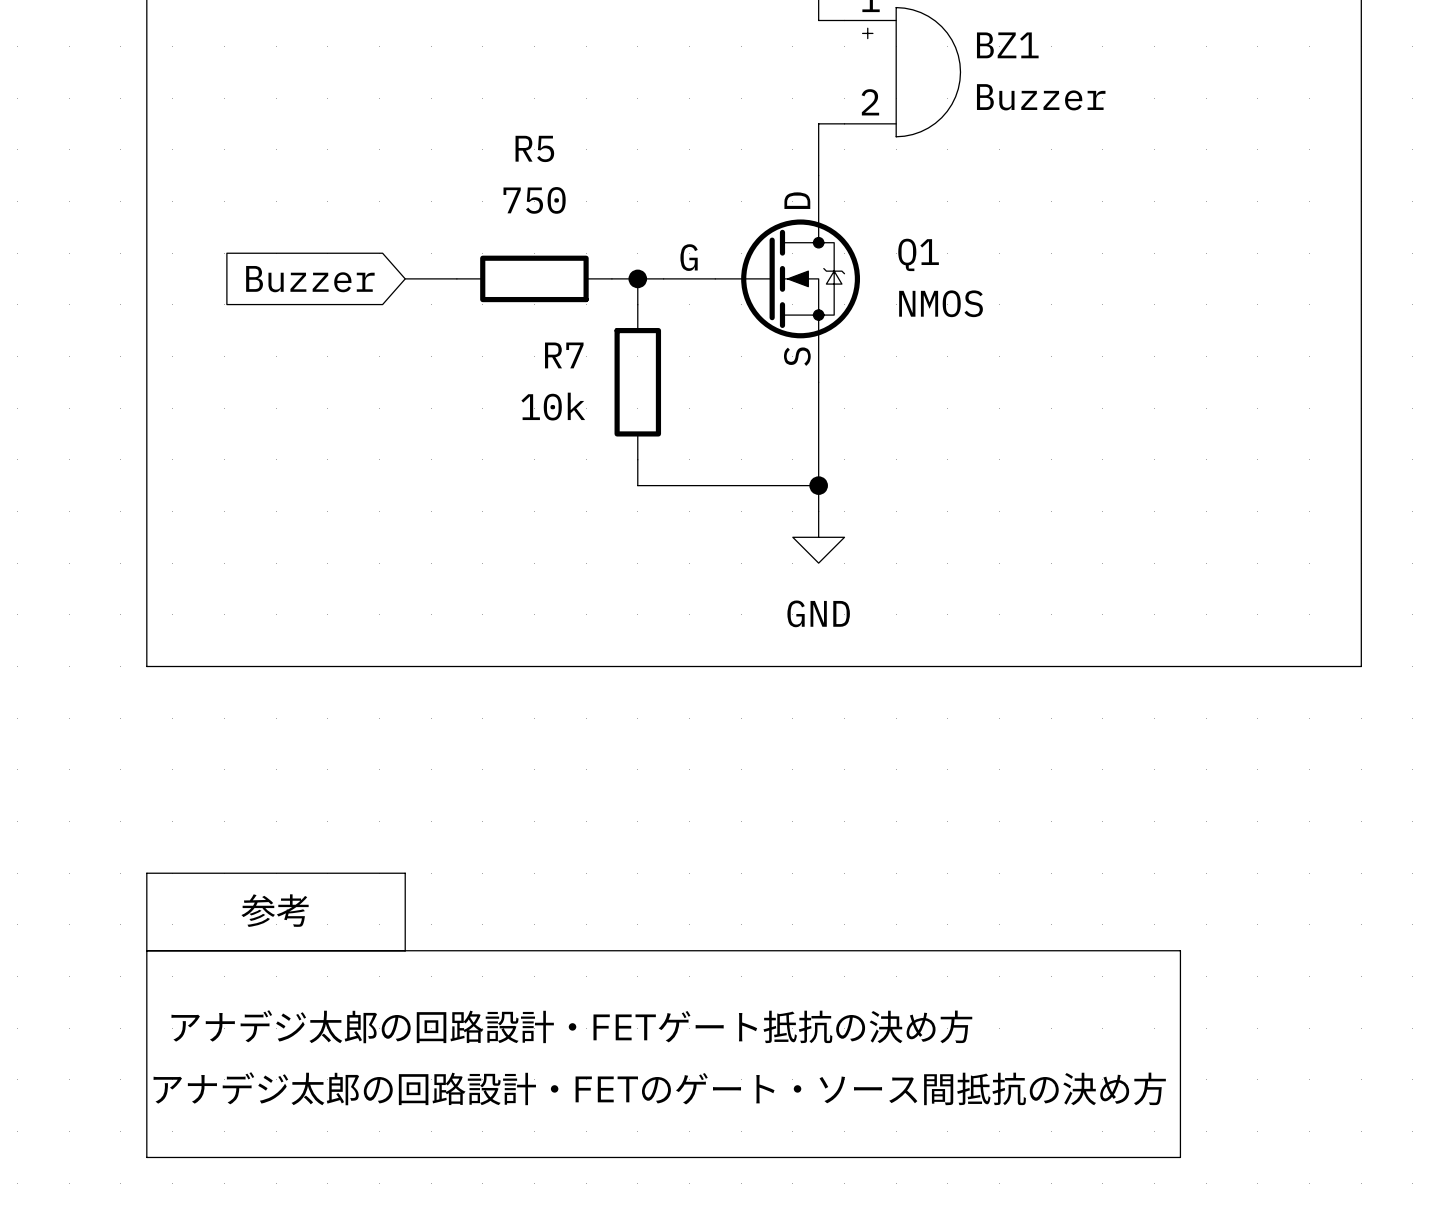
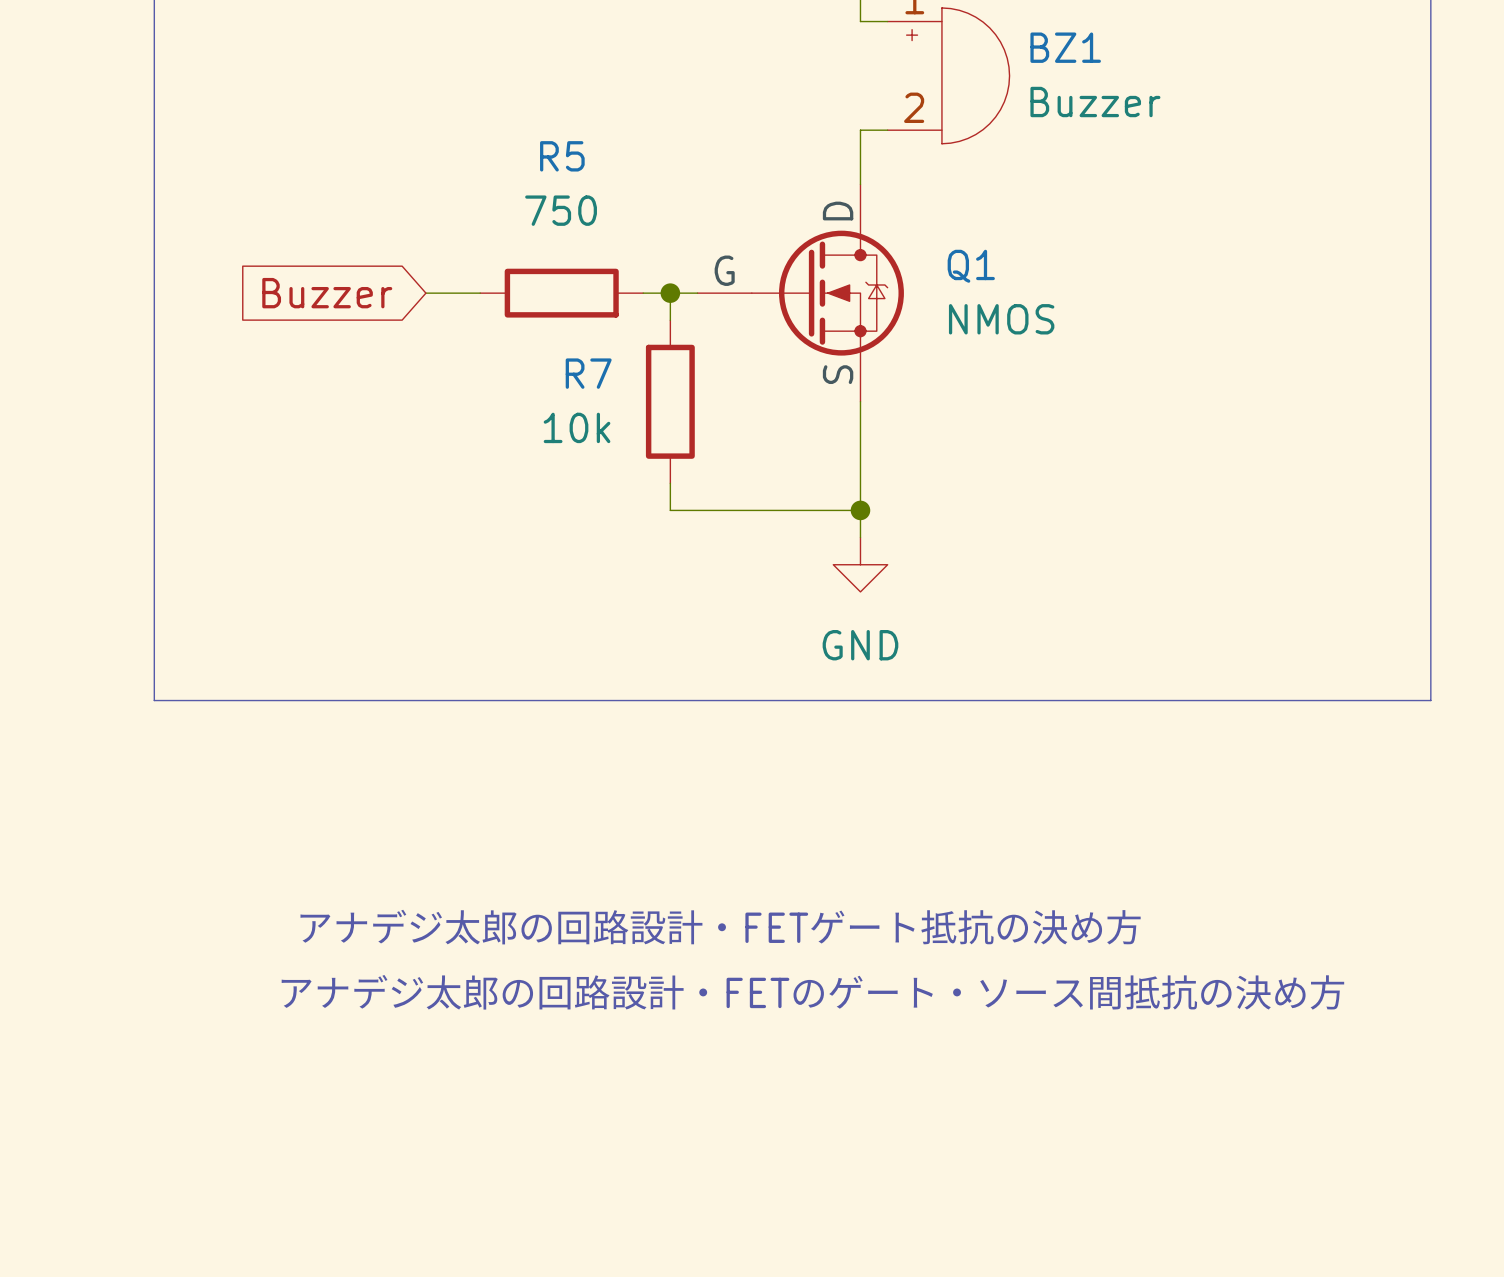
text: 参考 (275, 910) -> none
line: (146, 950) (1180, 950) (1180, 1157) (146, 1157) (146, 873) (405, 873) (405, 950) -> none
text position: アナデジ太郎の回路設計・FETゲート抵抗の決め方 (571, 1026) -> アナデジ太郎の回路設計・FETゲート抵抗の決め方 (720, 927)
text position: アナデジ太郎の回路設計・FETのゲート・ソース間抵抗の決め方 (659, 1088) -> アナデジ太郎の回路設計・FETのゲート・ソース間抵抗の決め方 (812, 992)

